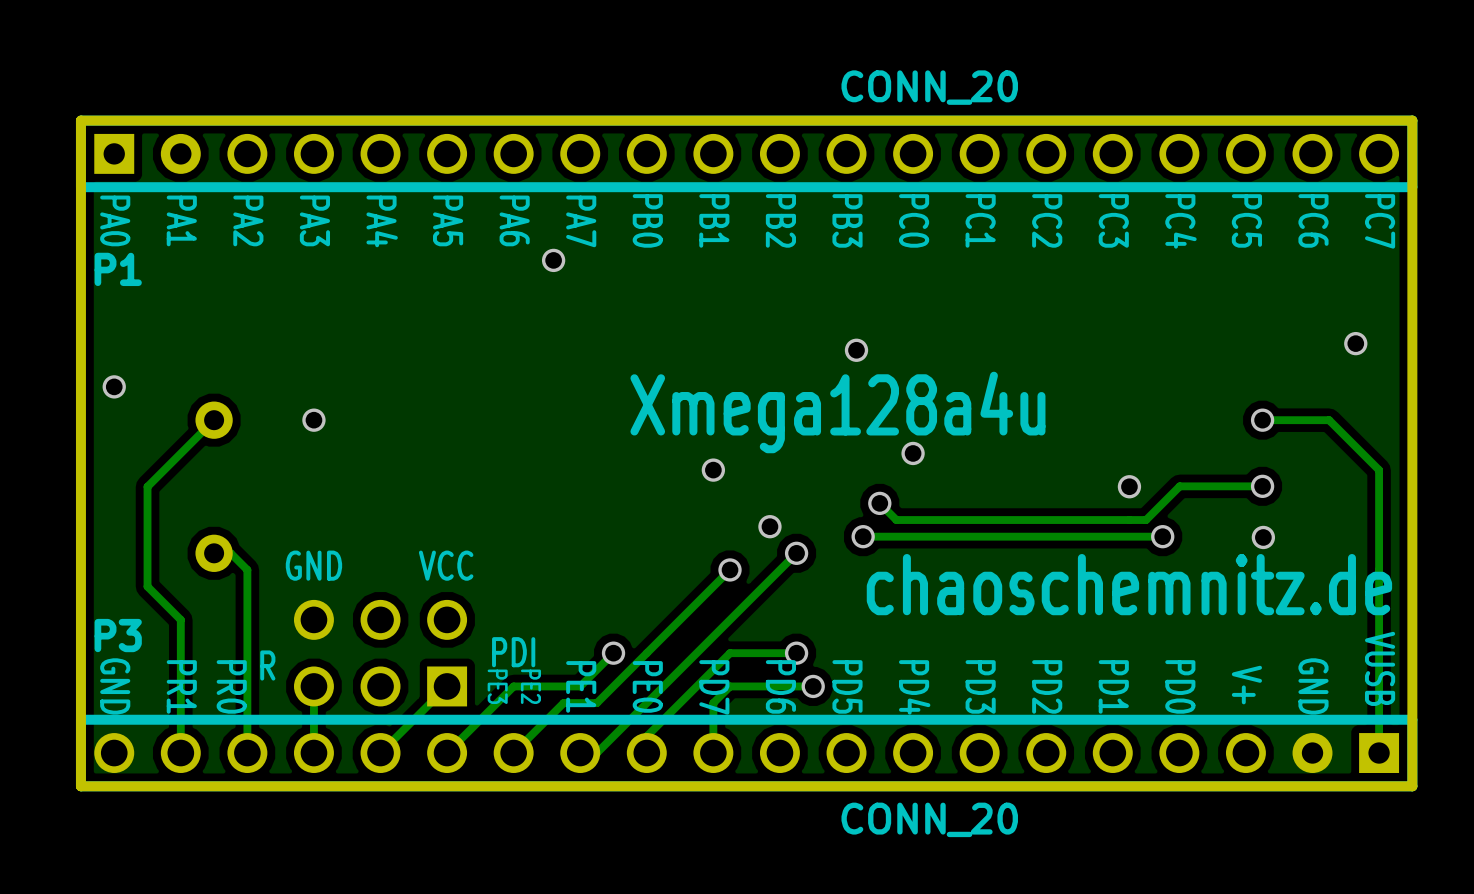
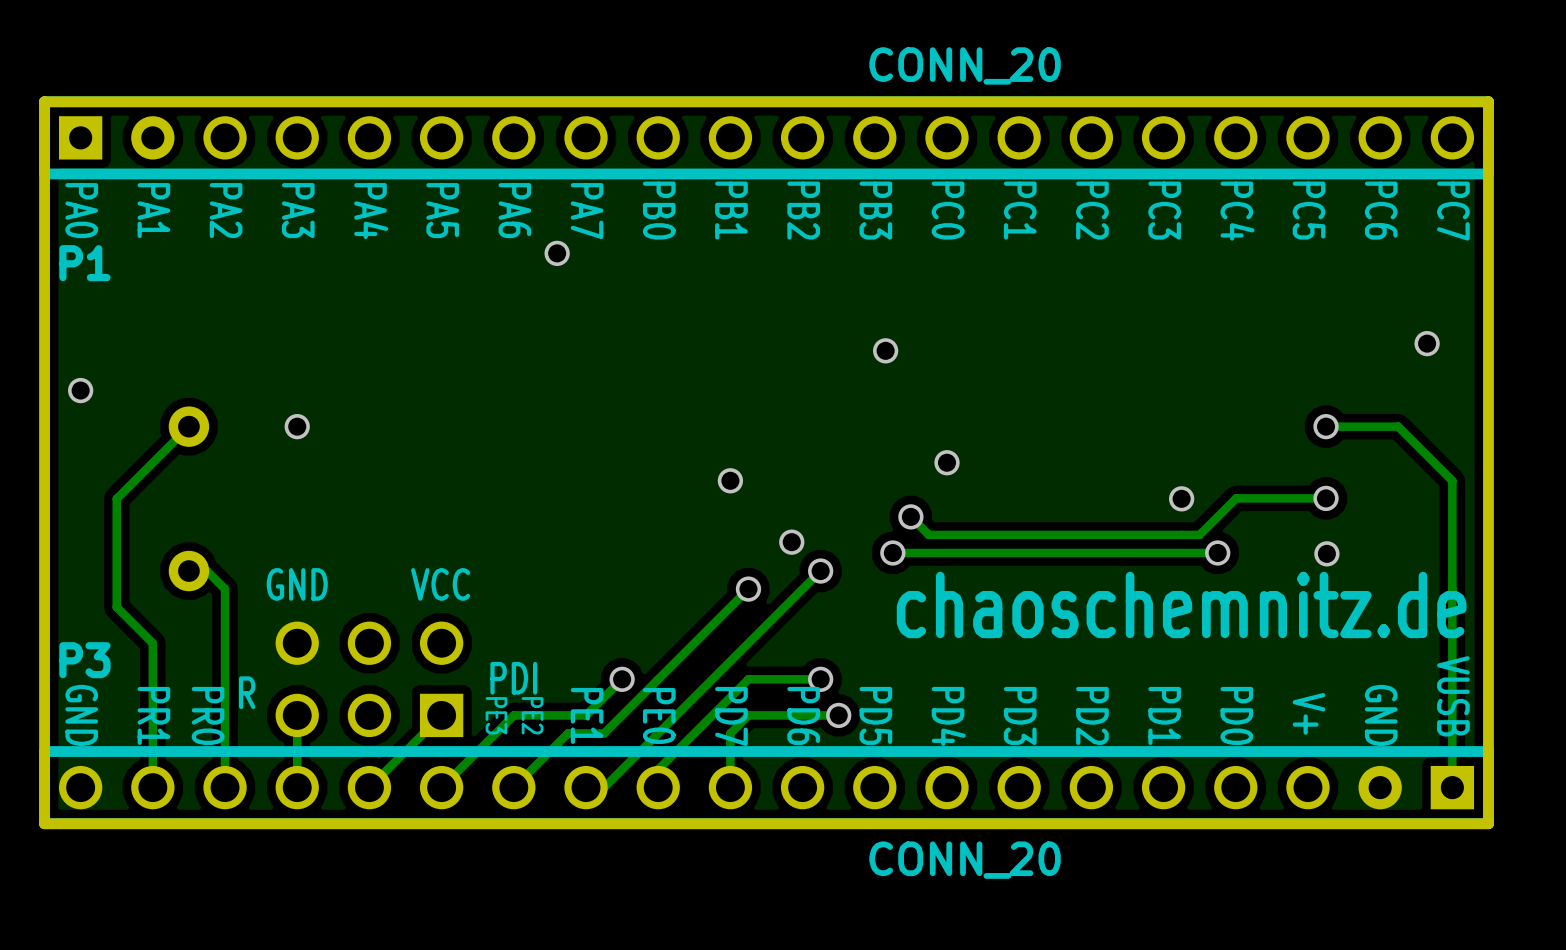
text: Xmega128a4u (837, 412) -> none

